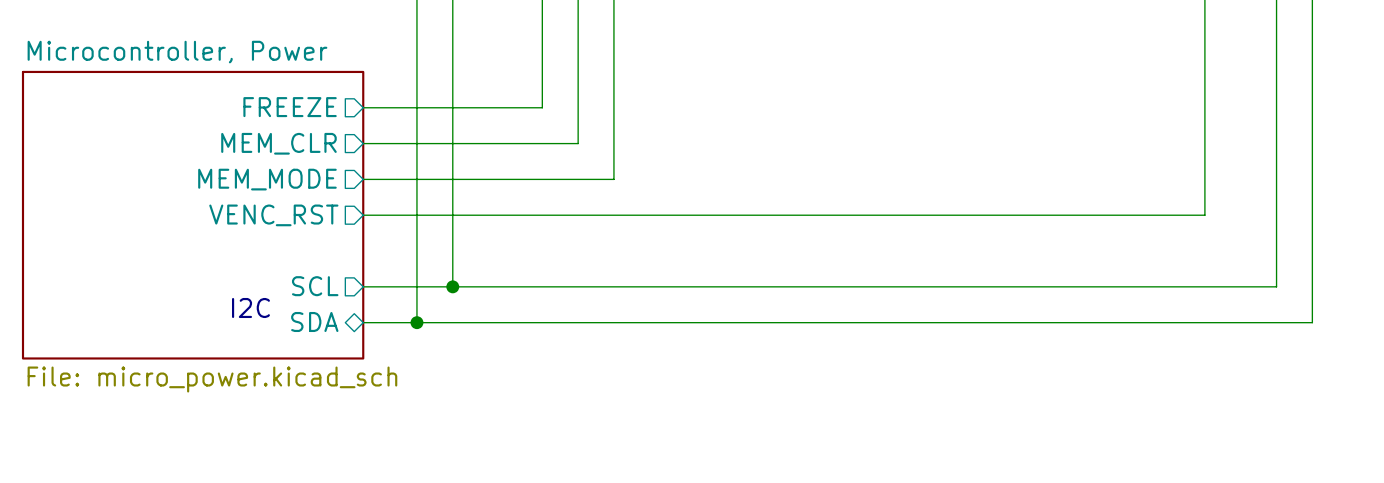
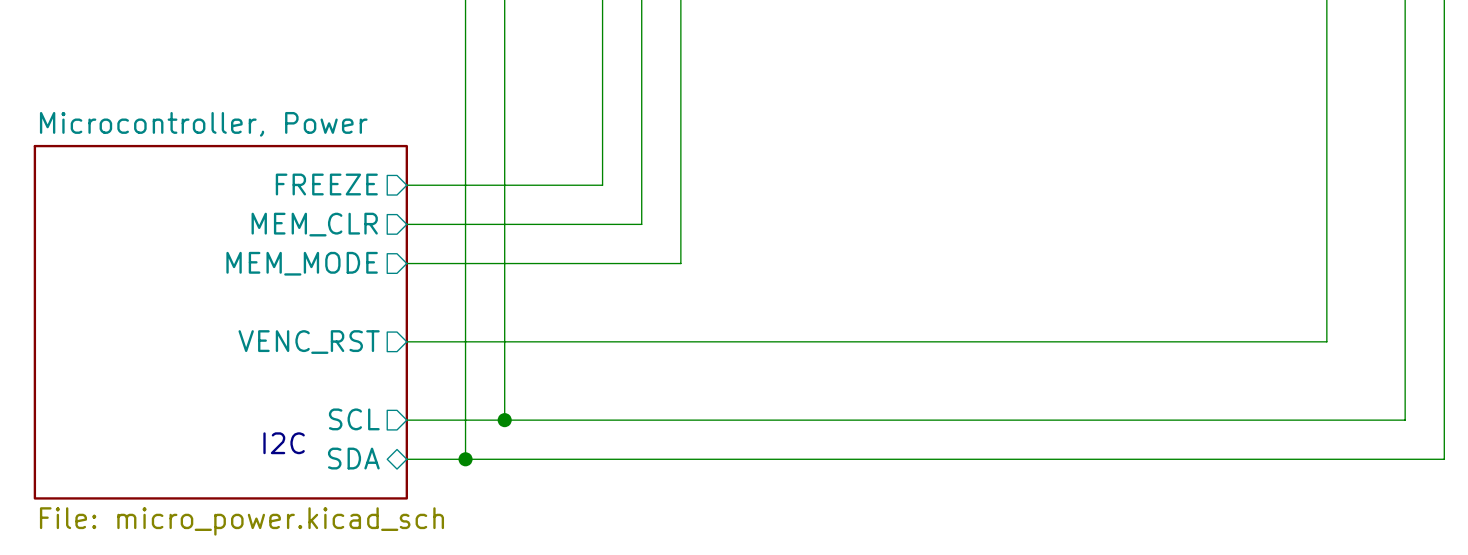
sheet Microcontroller, Power: File: micro_power.kicad_sch (193, 215) -> none
sheet pin position: VENC_RST (273, 215) -> VENC_RST (309, 342)
wire: (363, 215) (1204, 215) -> (406, 341) (1326, 341) (1326, 302)
sheet Microcontroller, Power: none -> File: micro_power.kicad_sch (220, 322)
sheet pin: SCL (315, 286) -> none
wire: (363, 286) (1276, 286) -> none
wire: none -> (504, 380) (504, 420)
junction: (452, 286) -> none
text position: I2C (250, 307) -> I2C (284, 443)
sheet pin shape: bidirectional (314, 321) -> output (354, 419)
sheet pin: SDA (314, 321) -> SCL (354, 419)
wire: none -> (465, 420) (465, 459)
junction: (416, 322) -> none
junction: none -> (504, 420)
wire: (1276, 322) (1312, 322) -> (1405, 420) (1405, 380)
wire: none -> (1444, 420) (1444, 459) (406, 459)
sheet pin: none -> SDA (353, 458)
junction: none -> (465, 459)

